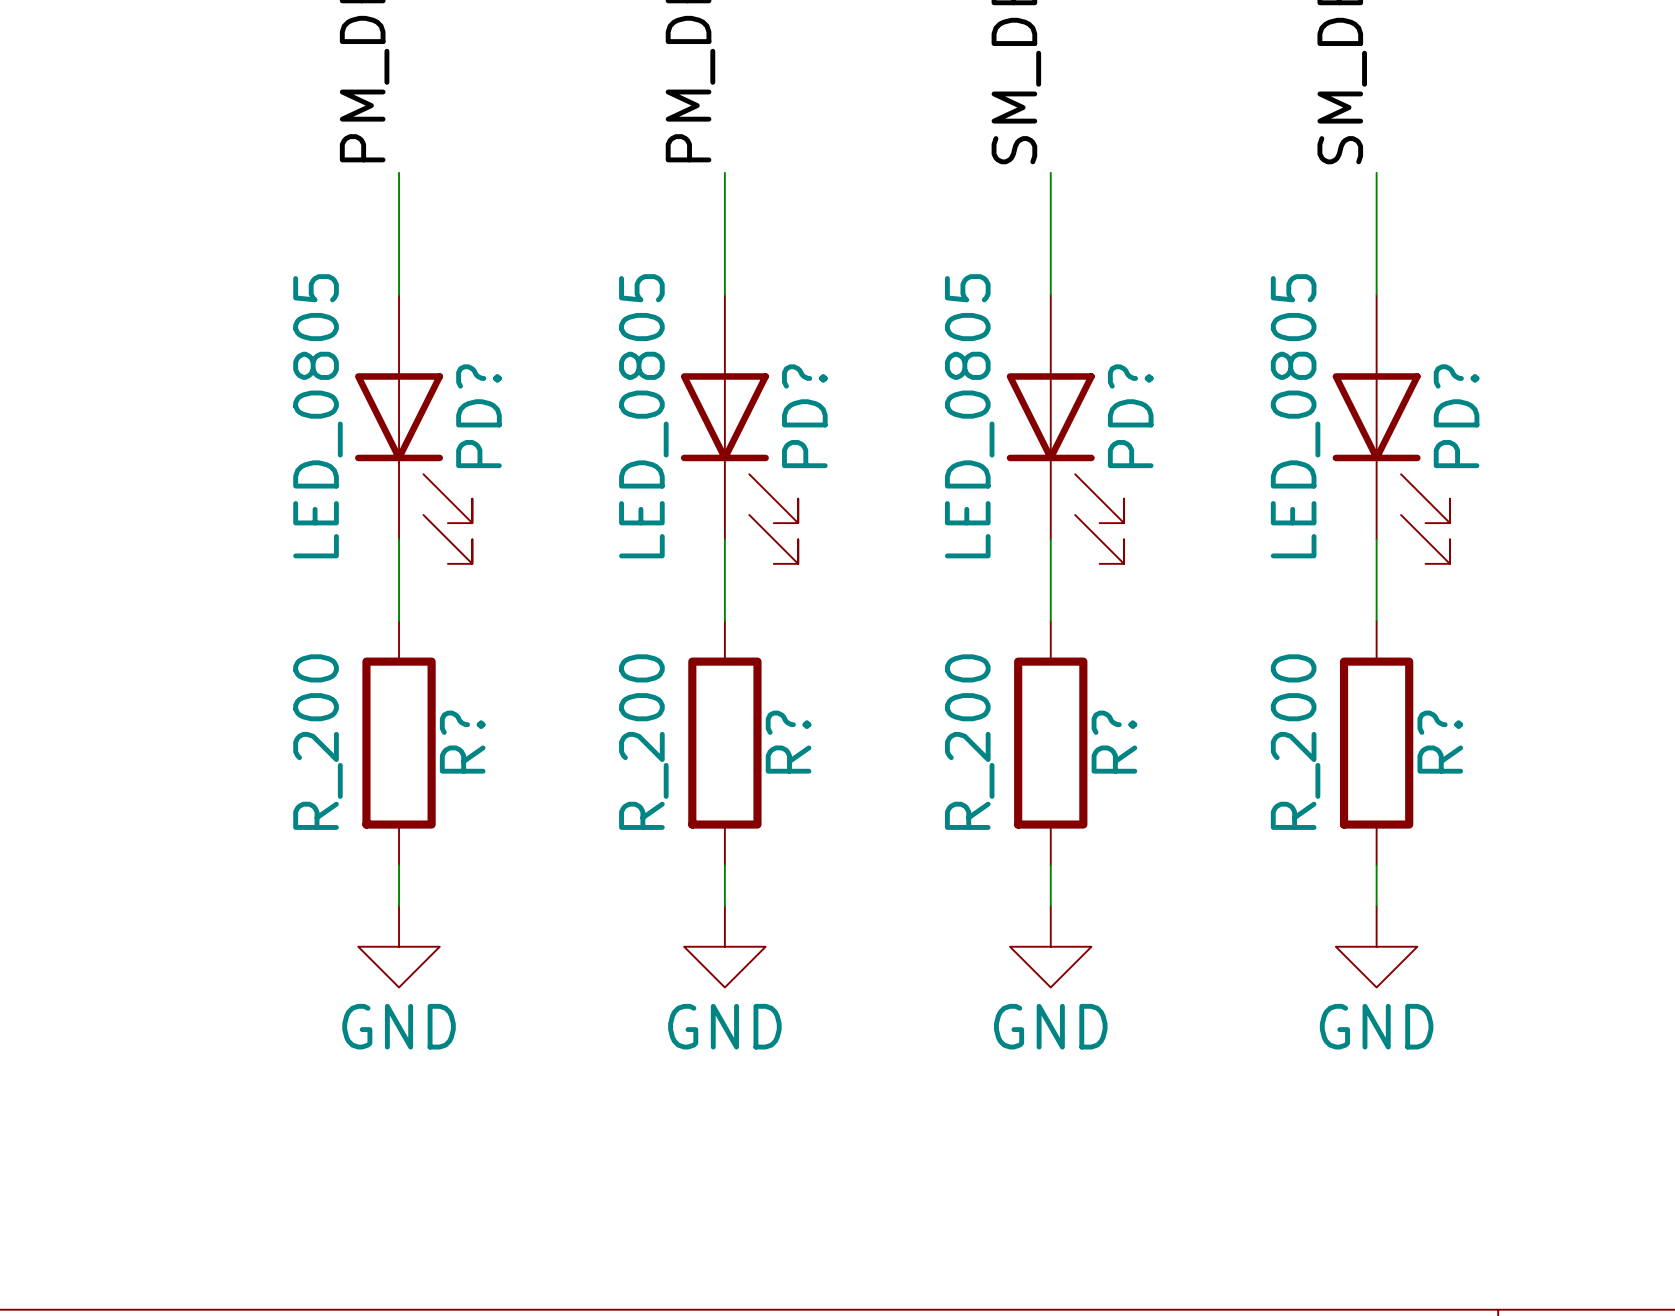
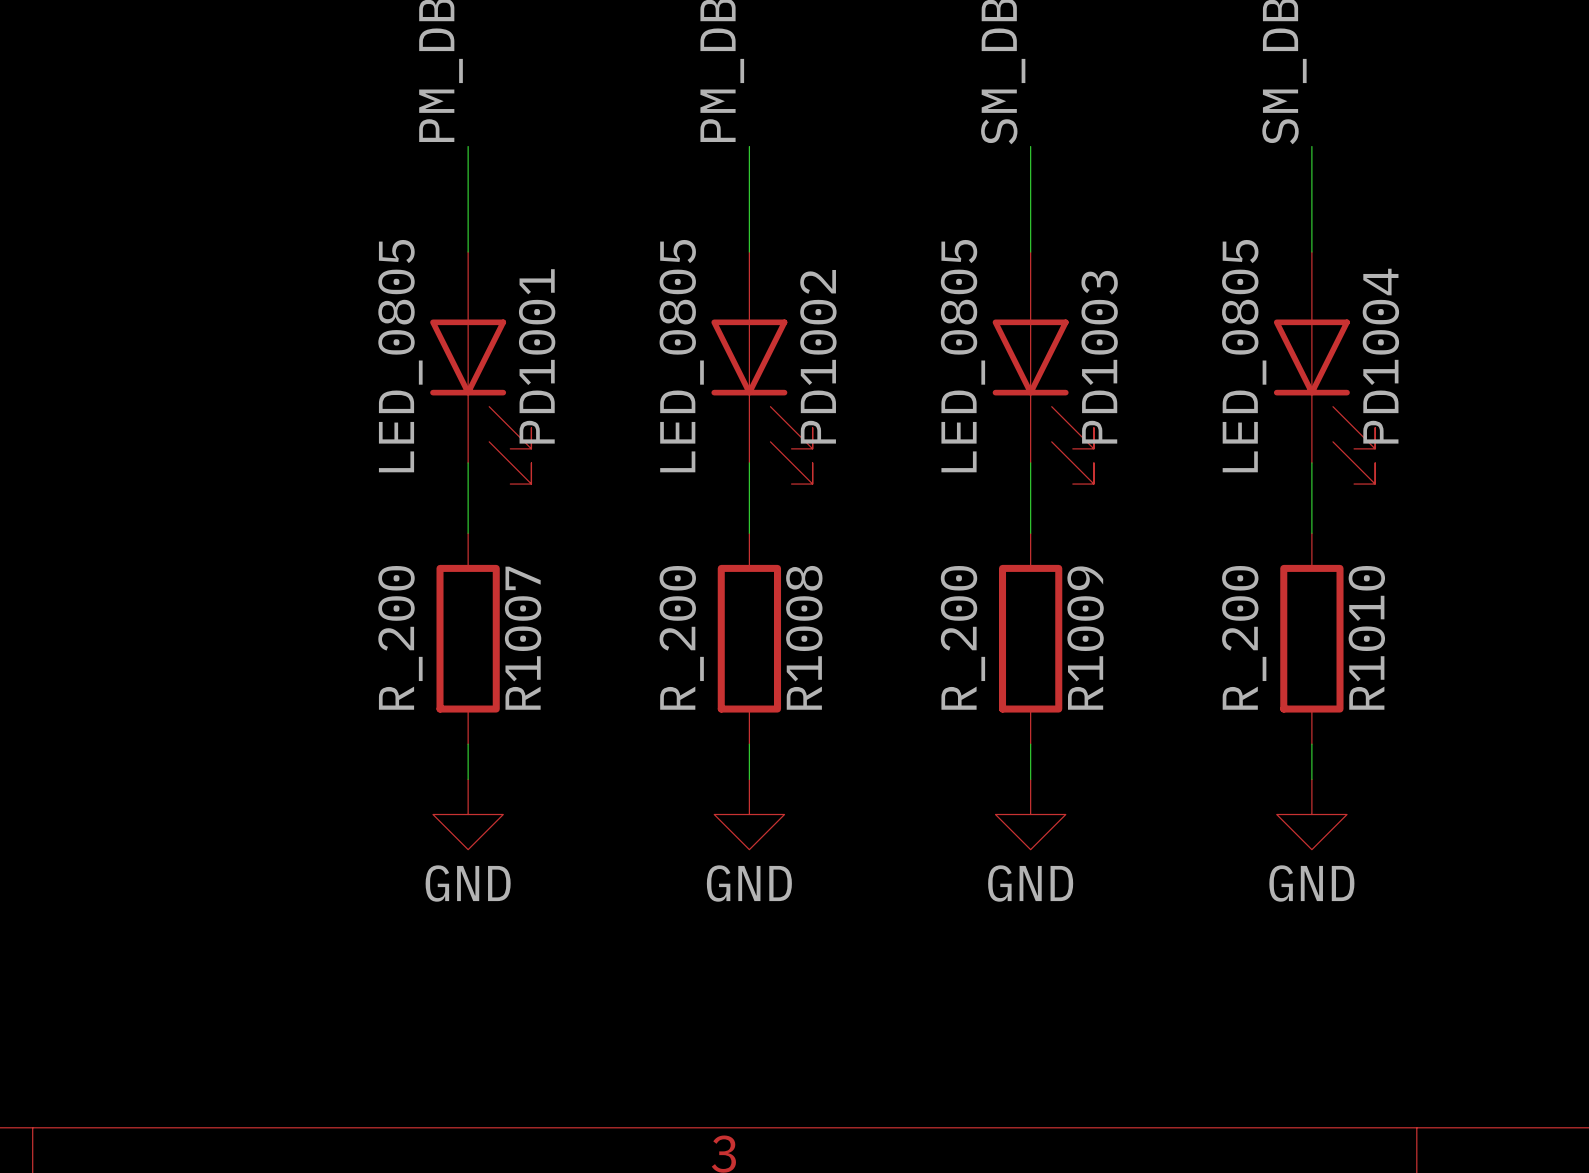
PD? name: PD? (478, 416) -> PD1001 (537, 356)
PD? name: PD? (804, 416) -> PD1002 (818, 356)
PD? name: PD? (1130, 416) -> PD1003 (1099, 357)
PD? name: PD? (1456, 416) -> PD1004 (1380, 356)
R? name: R? (462, 742) -> R1007 (523, 638)
R? name: R? (788, 742) -> R1008 (804, 637)
R? name: R? (1114, 742) -> R1009 (1085, 638)
R? name: R? (1440, 742) -> R1010 (1366, 637)

